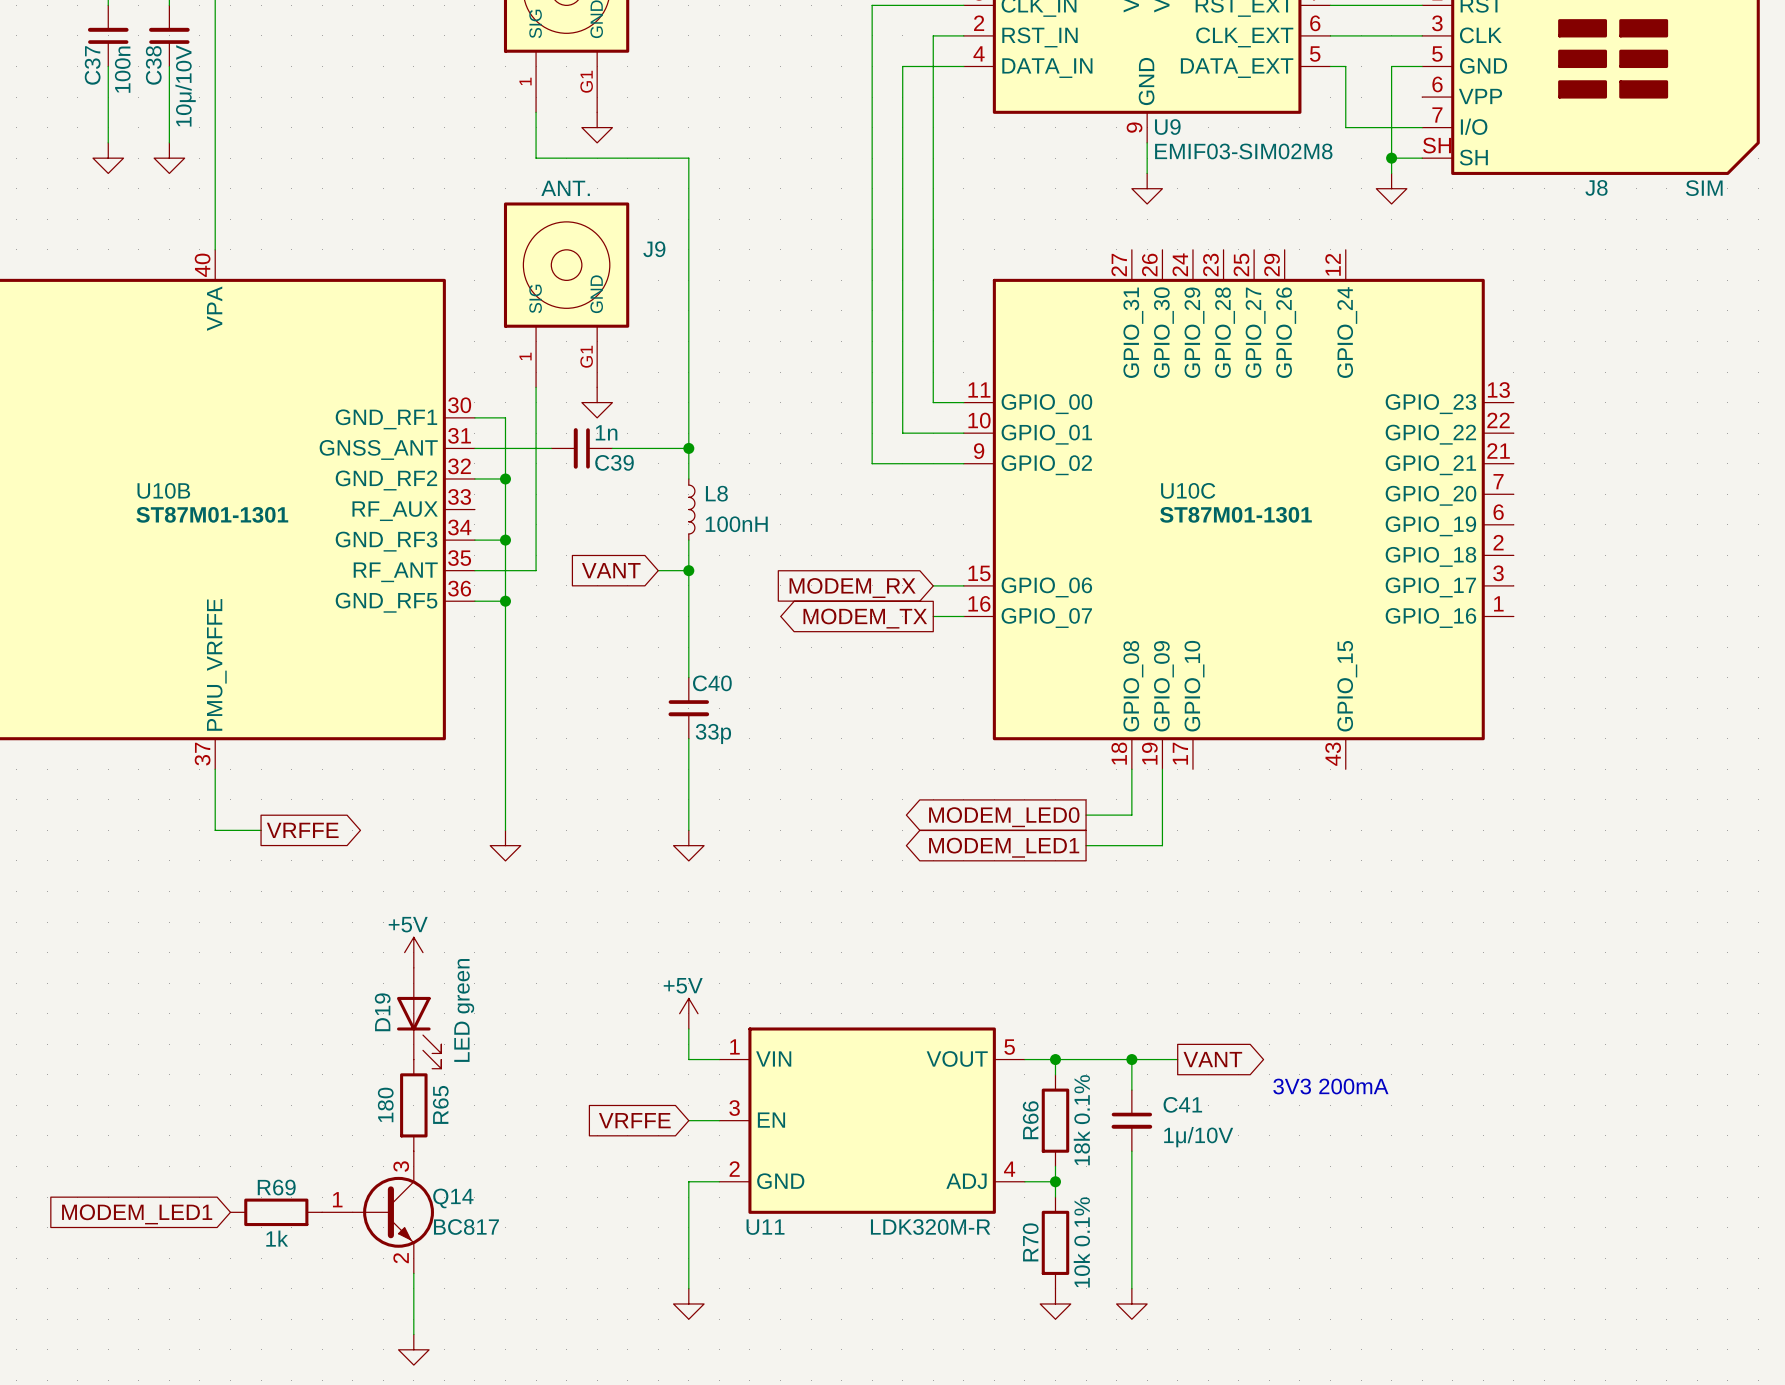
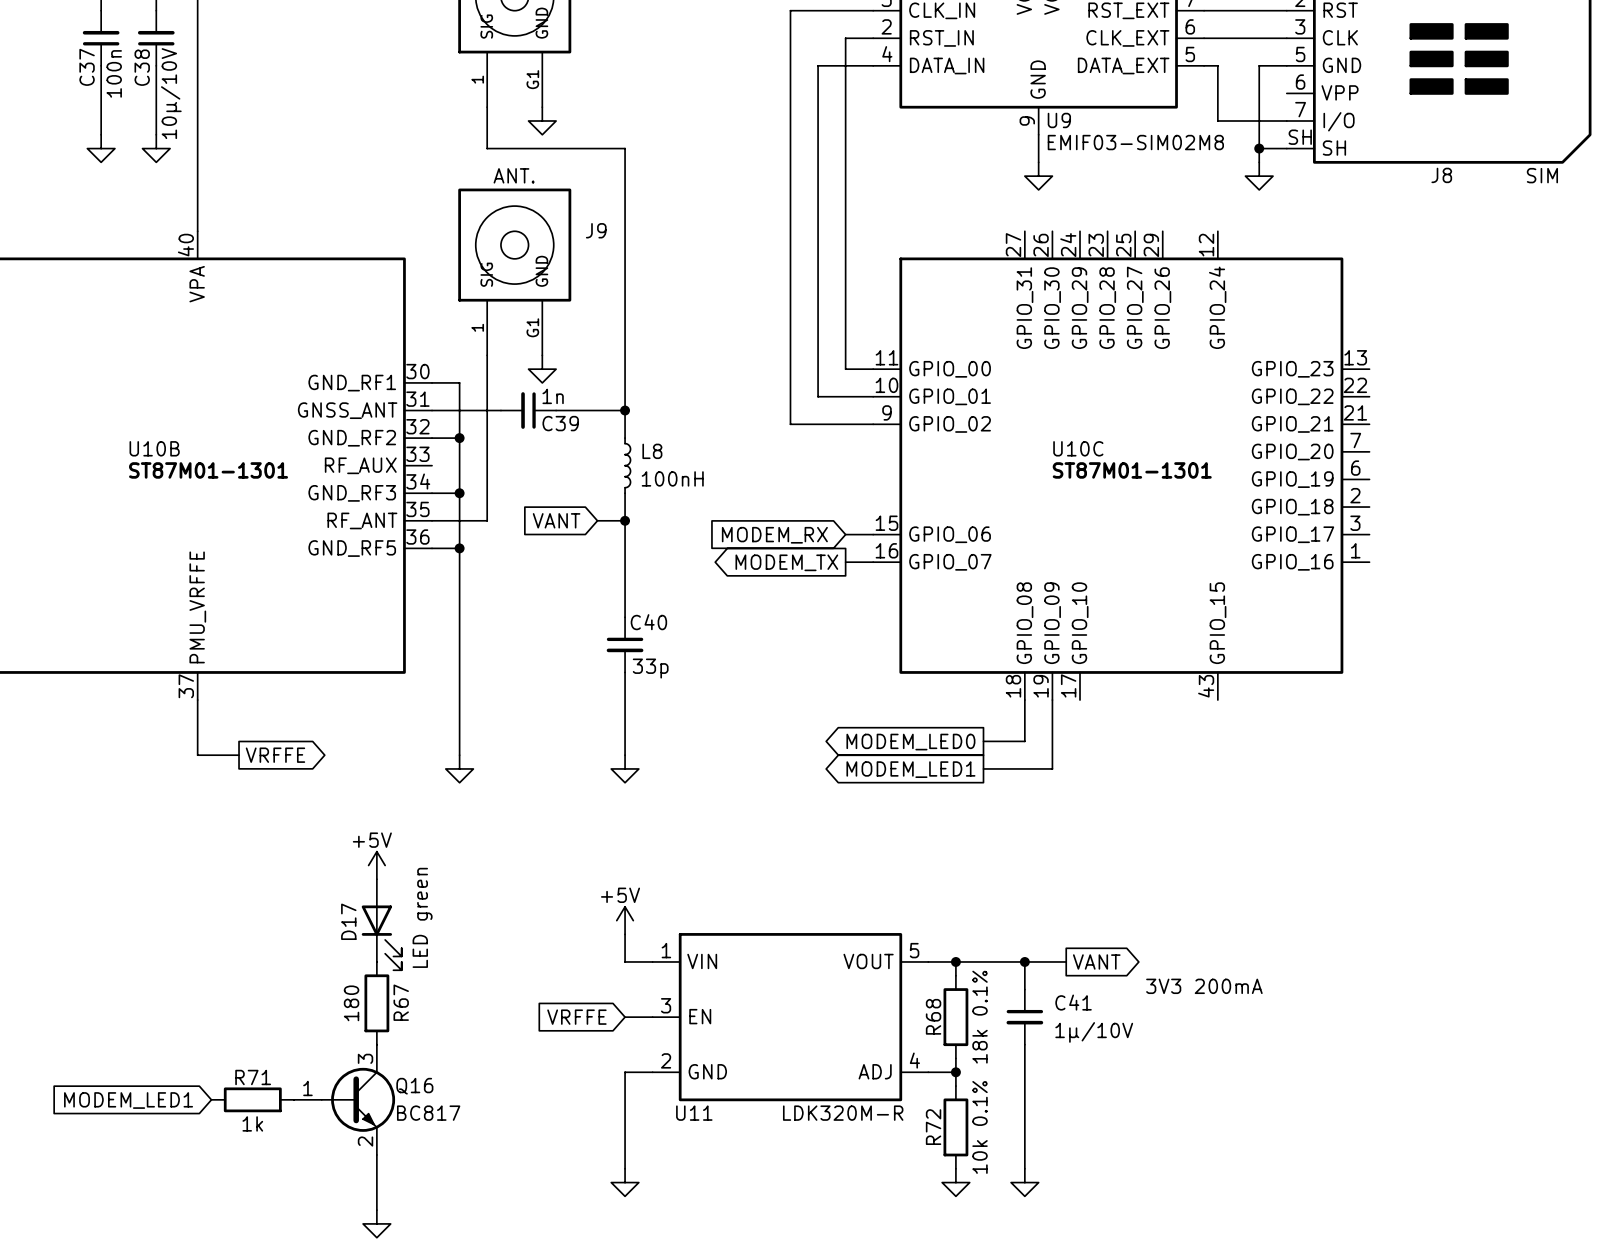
D19 name: D19 (382, 1012) -> D17 (348, 921)
R65 name: R65 (440, 1104) -> R67 (401, 1002)
R66 name: R66 (1030, 1120) -> R68 (933, 1016)
R69 name: R69 (276, 1187) -> R71 (253, 1077)
Q14 name: Q14 (453, 1198) -> Q16 (414, 1086)
R70 name: R70 (1030, 1242) -> R72 (933, 1127)

